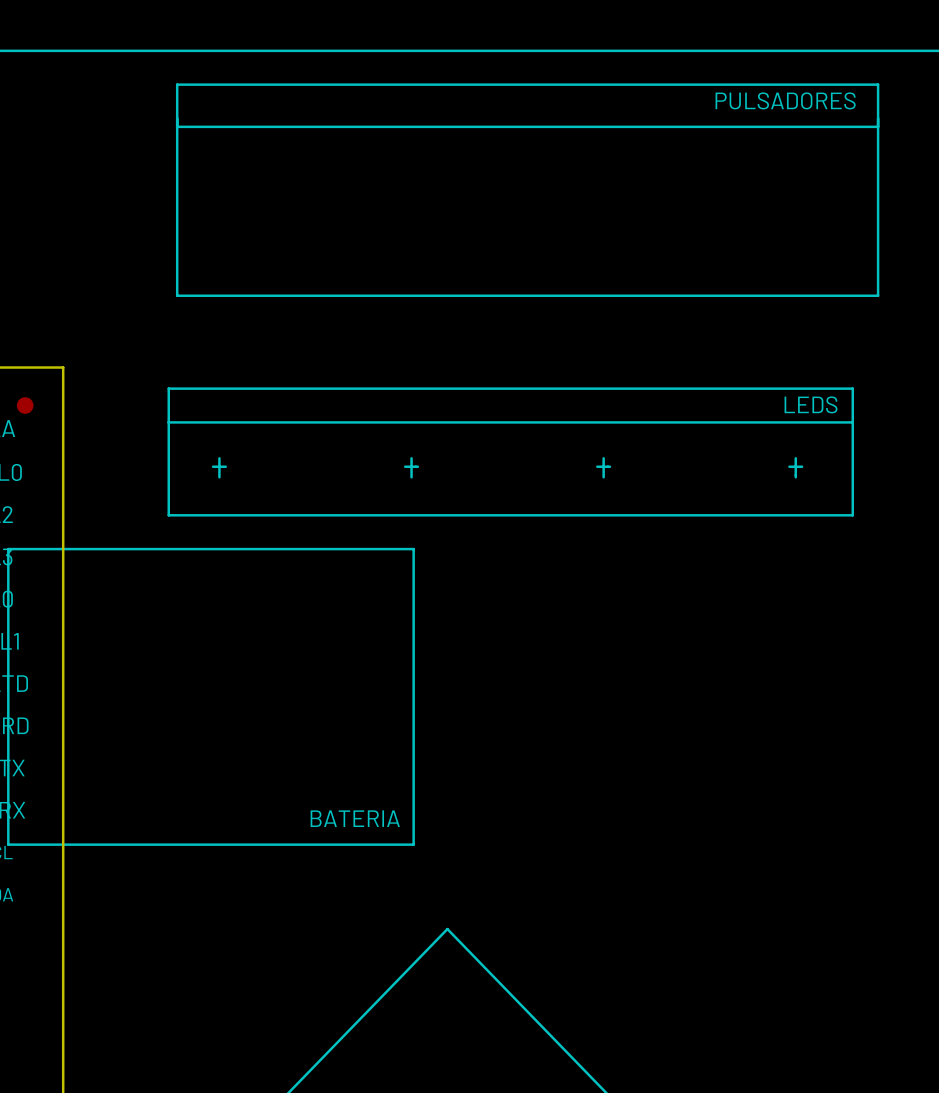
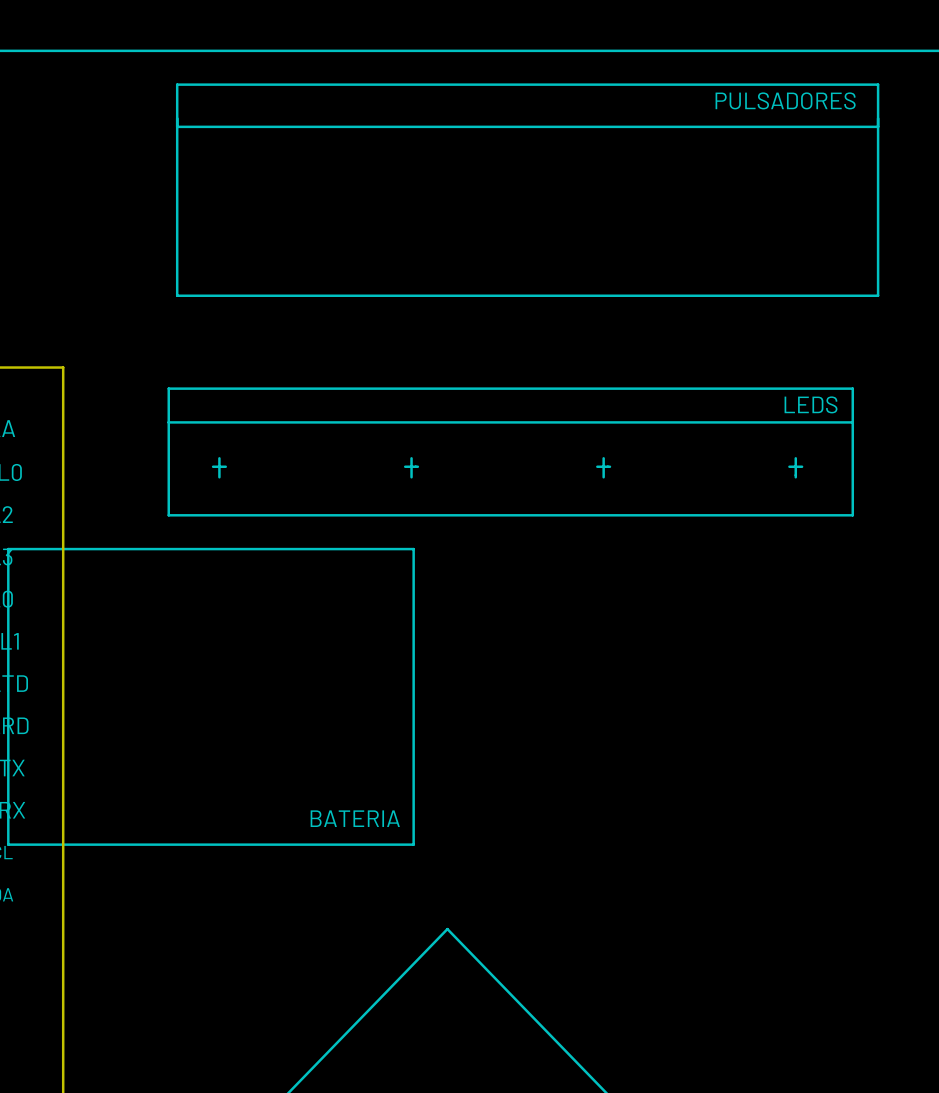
part: (25, 405) -> none

